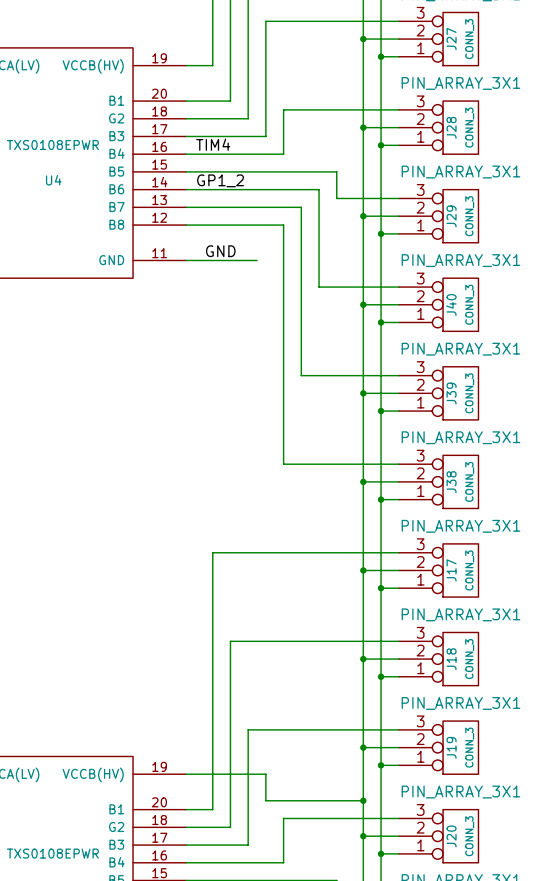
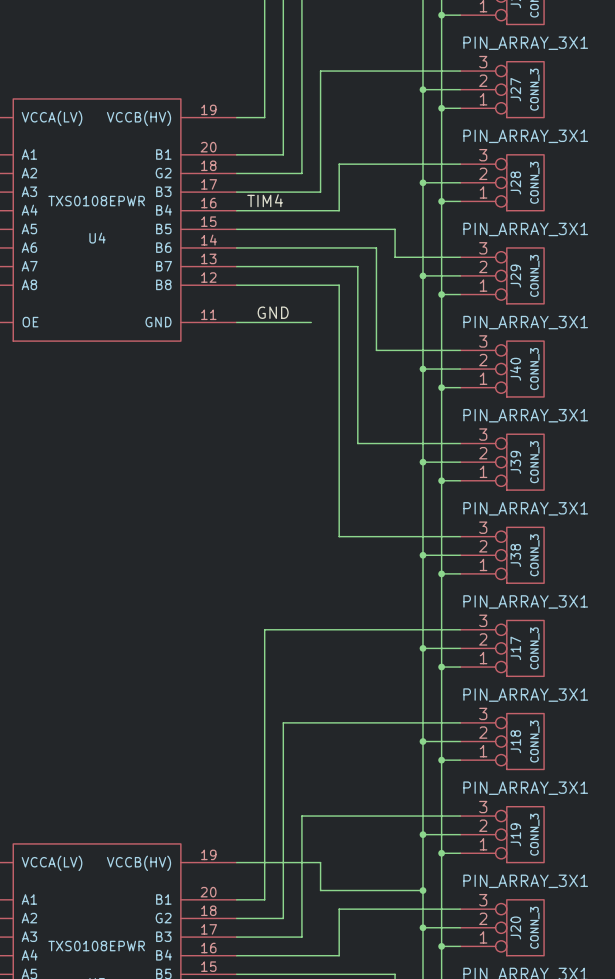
label: GP1_2 (220, 180) -> none

